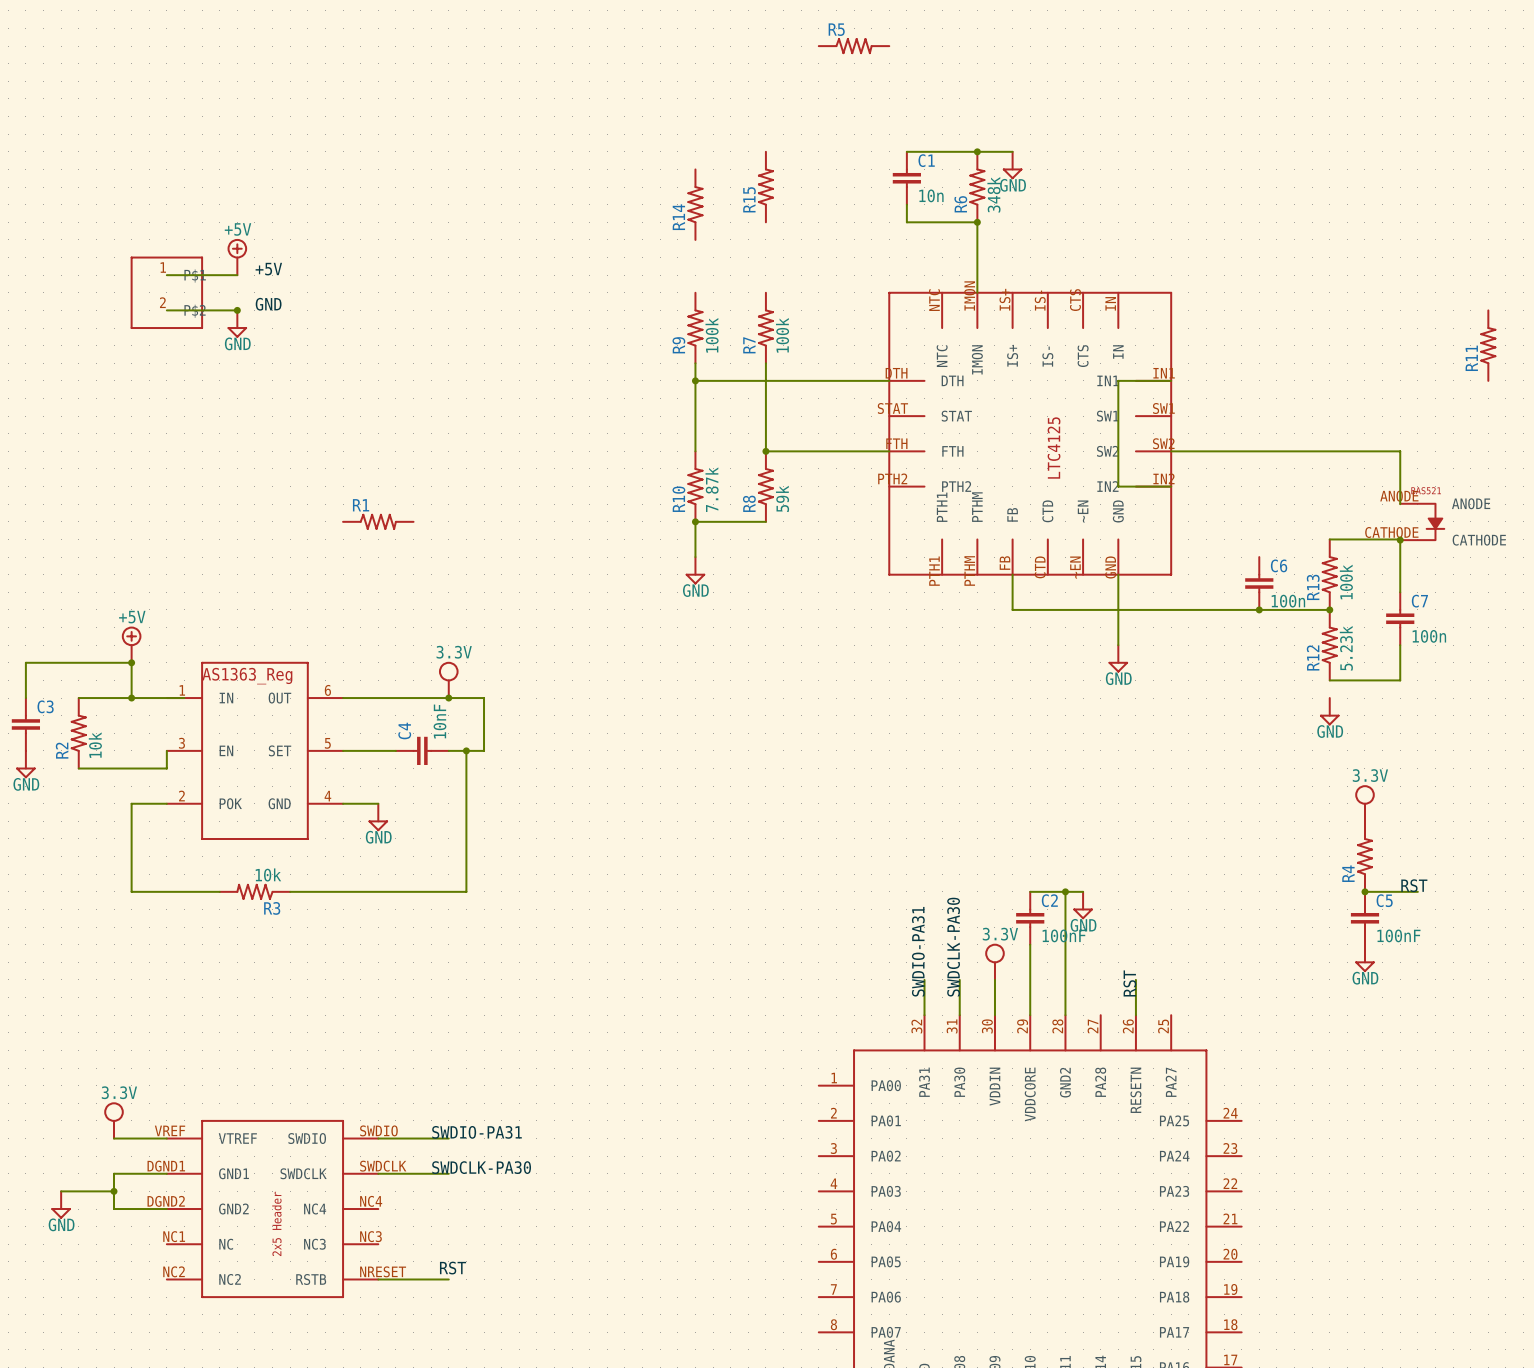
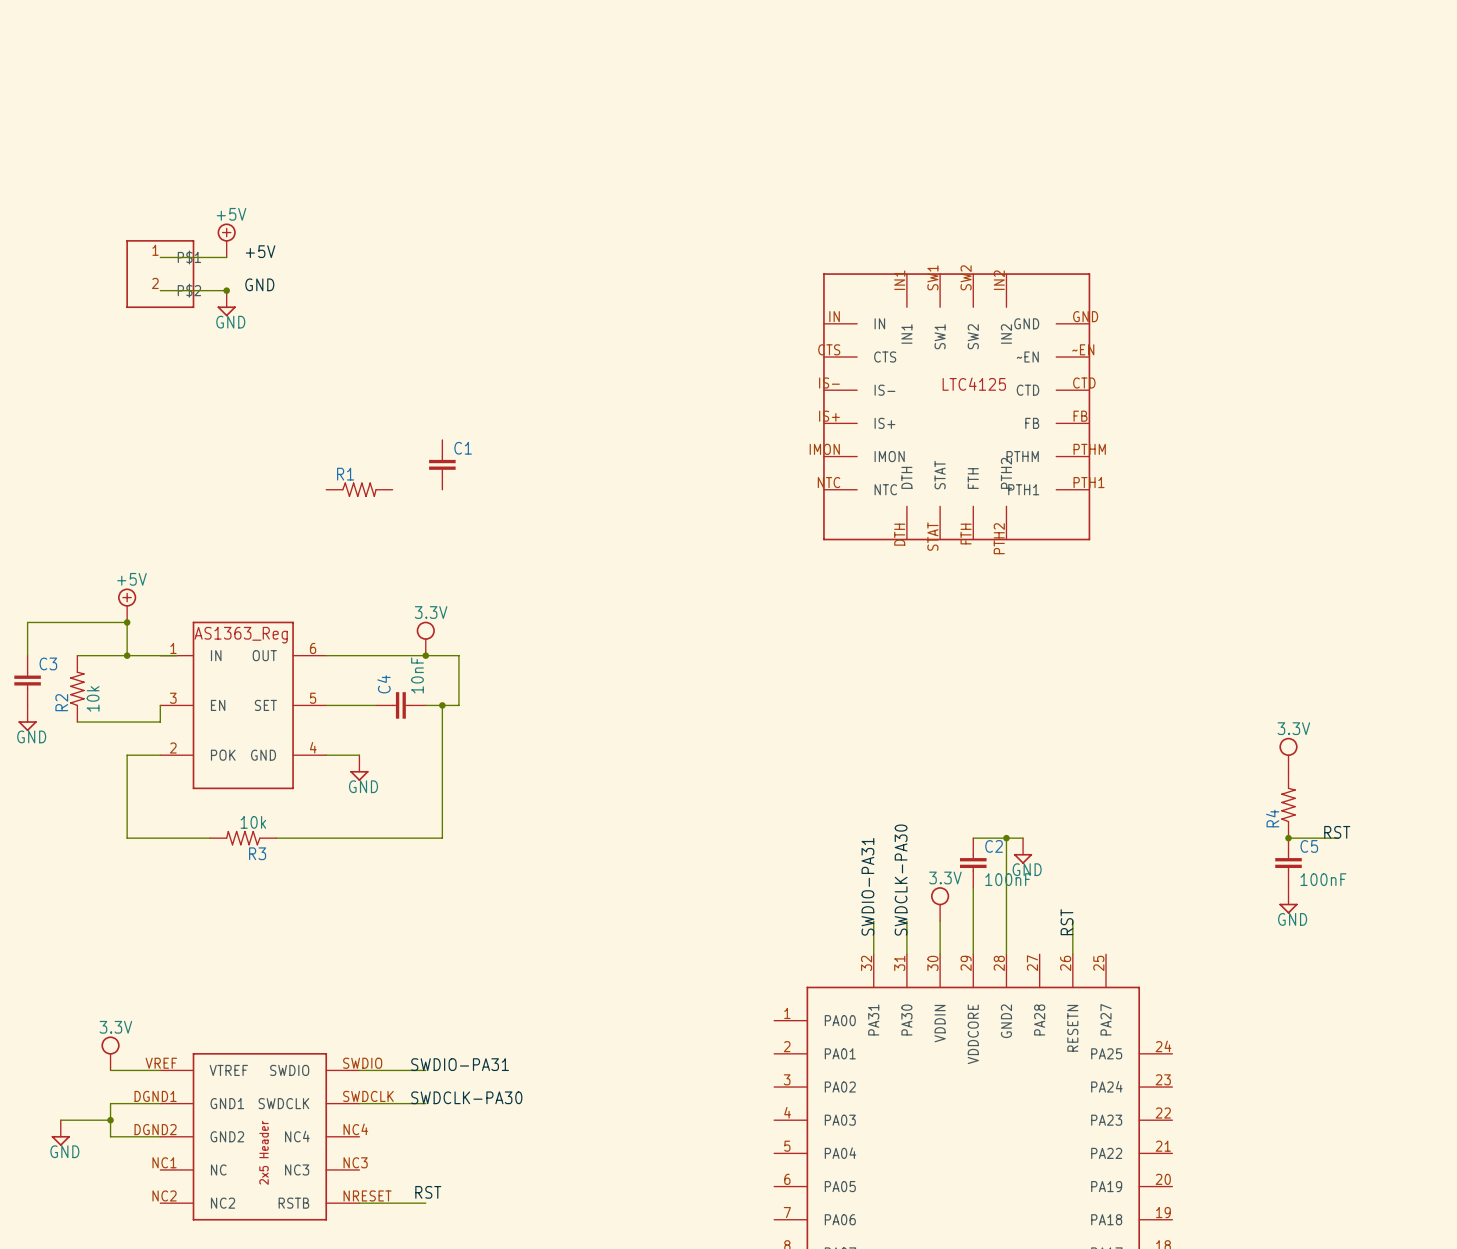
R5: (854, 46) -> none
wire: (906, 151) (1012, 151) -> none
junction: (977, 151) -> none
power symbol: GND (1012, 165) -> none
C1 position: (906, 178) -> (442, 464)
R15: (765, 187) -> none
R6: 348k (977, 187) -> none
C1 value: 10n (931, 195) -> none
R14: (695, 204) -> none
wire: (906, 204) (906, 222) (977, 222) (977, 292) -> none
junction: (977, 222) -> none
R9: 100k (695, 328) -> none
R7: 100k (765, 328) -> none
R11: (1488, 345) -> none
wire: (695, 363) (695, 451) -> none
wire: (765, 363) (765, 451) (889, 451) -> none
wire: (695, 380) (889, 380) -> none
junction: (695, 380) -> none
wire: (1171, 380) (1118, 380) (1118, 486) (1171, 486) -> none
part: none -> (956, 406)
part: (1030, 433) -> none
junction: (765, 451) -> none
wire: (1171, 451) (1400, 451) (1400, 504) -> none
R10: 7.87k (695, 486) -> none
R8: 59k (765, 486) -> none
junction: (695, 521) -> none
wire: (765, 521) (695, 521) (695, 557) -> none
part: (1422, 521) -> none
wire: (1329, 539) (1400, 539) (1400, 592) -> none
junction: (1400, 540) -> none
power symbol: GND (695, 570) -> none
wire: (1012, 574) (1012, 609) (1329, 609) -> none
wire: (1118, 574) (1118, 645) -> none
R13: 100k (1329, 574) -> none
C6: 100n (1259, 583) -> none
junction: (1259, 609) -> none
junction: (1329, 609) -> none
C7: 100n (1400, 618) -> none
R12: 5.23k (1329, 645) -> none
wire: (1400, 645) (1400, 680) (1329, 680) -> none
power symbol: GND (1118, 658) -> none
power symbol: GND (1329, 711) -> none

